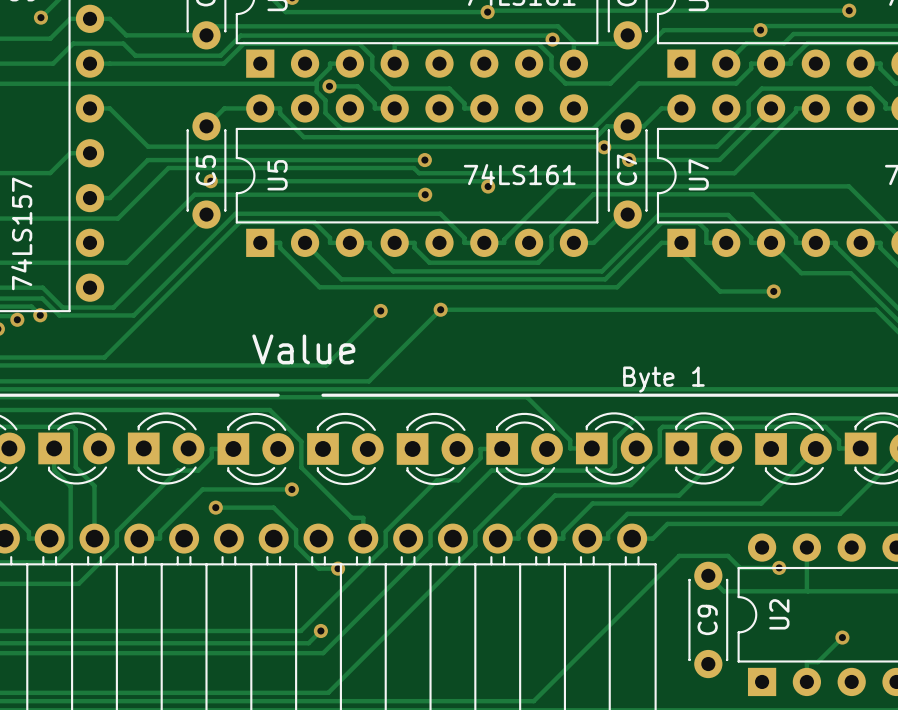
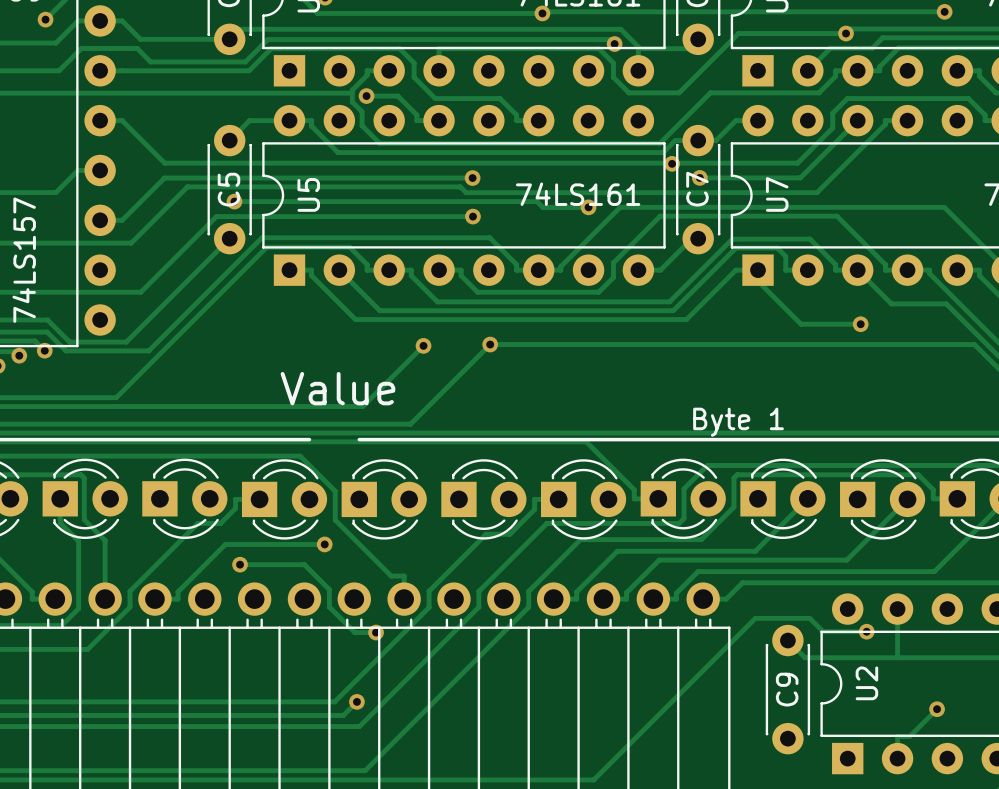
track: none -> (542, 207) (588, 207)
via position: (488, 186) -> (588, 207)

